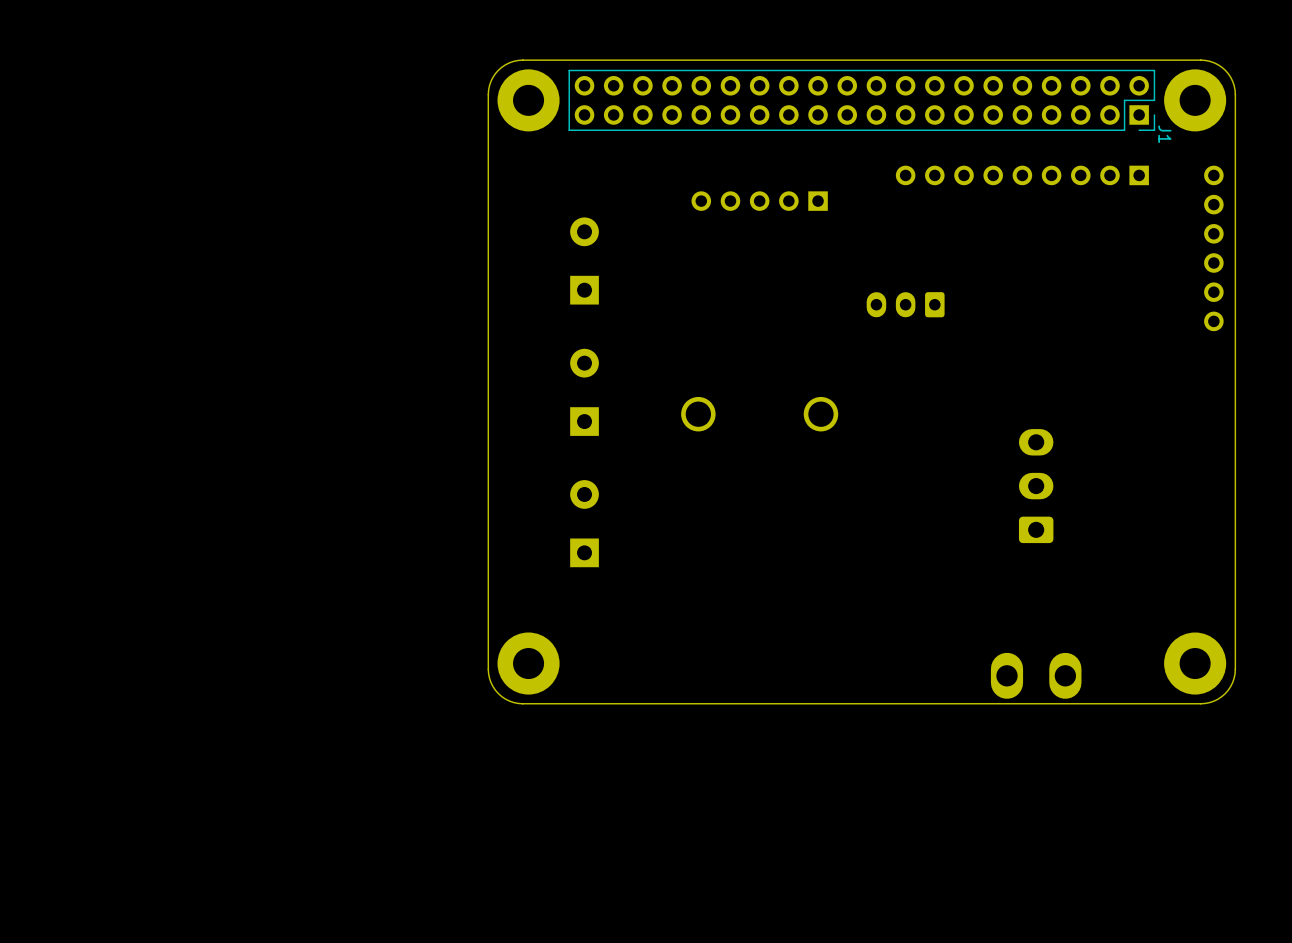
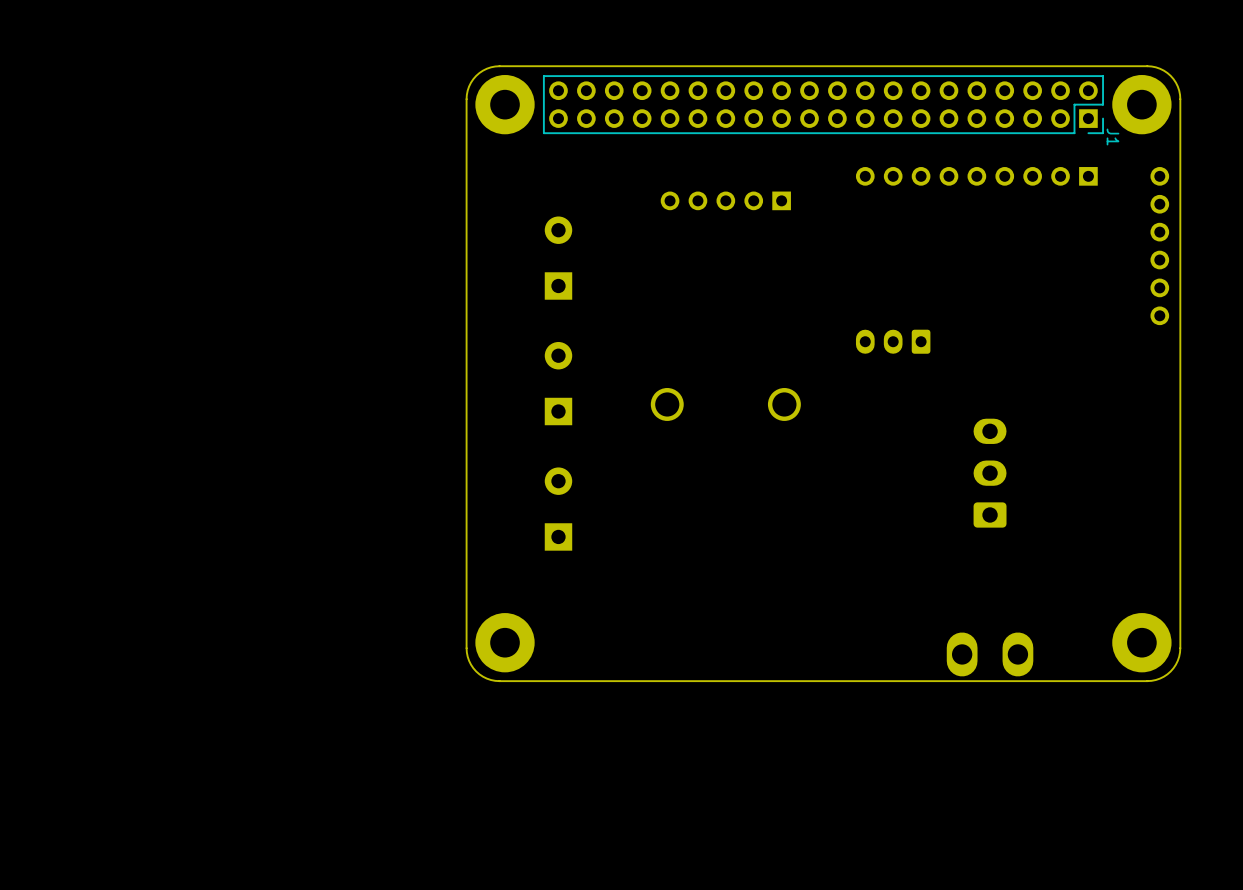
part position: (905, 304) -> (893, 341)

